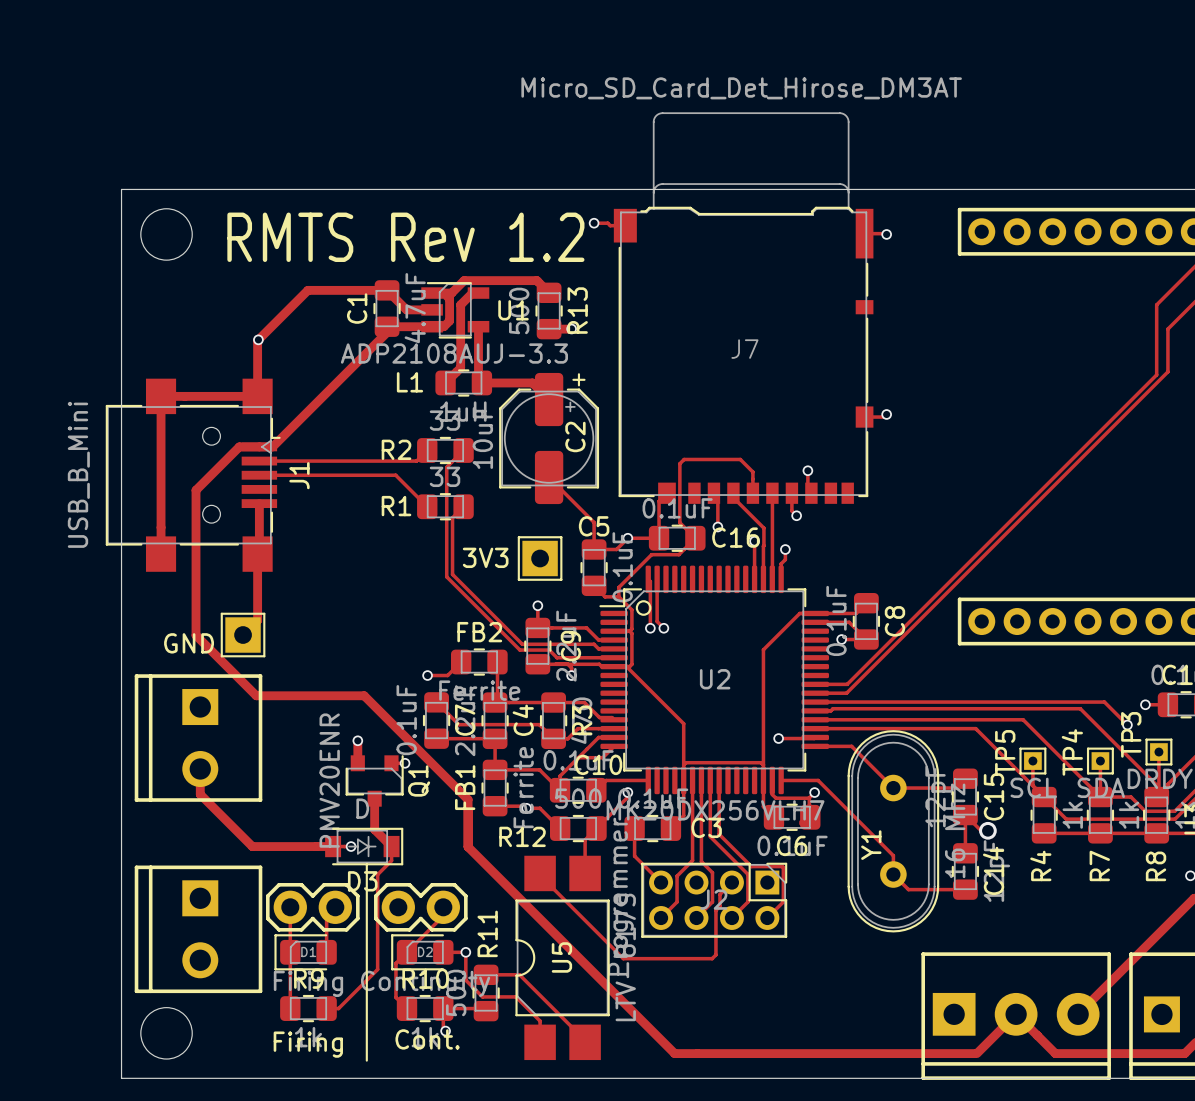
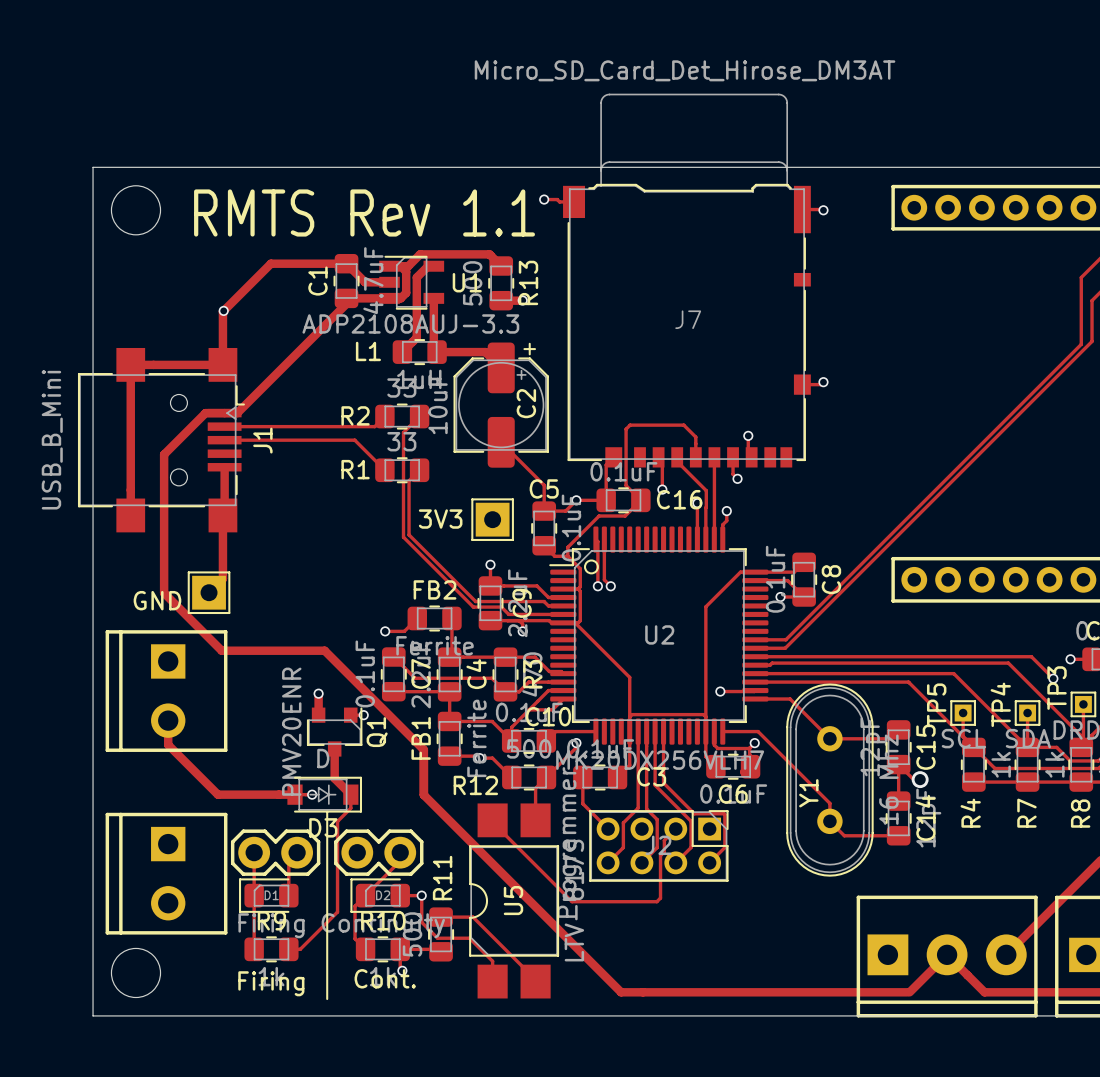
text: RMTS Rev 1.2 (405, 237) -> RMTS Rev 1.1 (364, 212)

